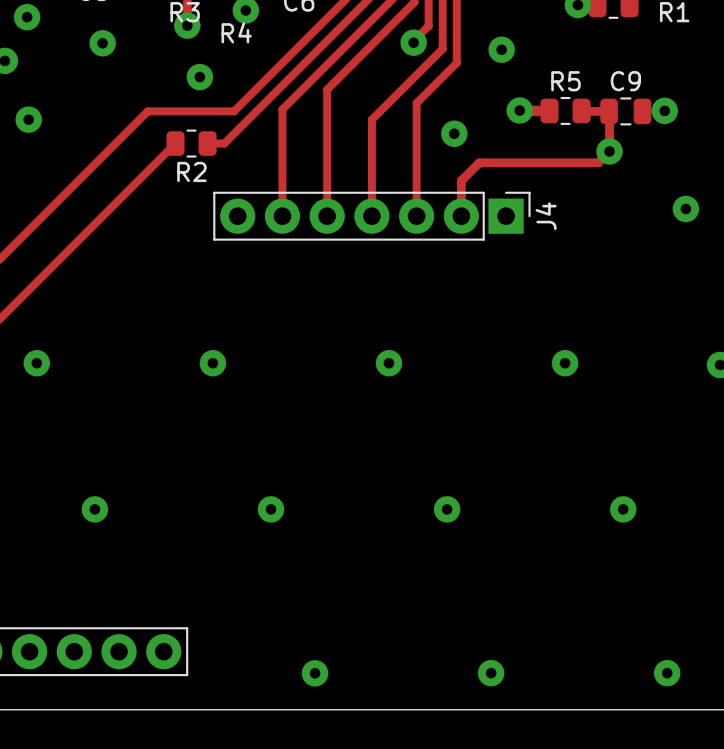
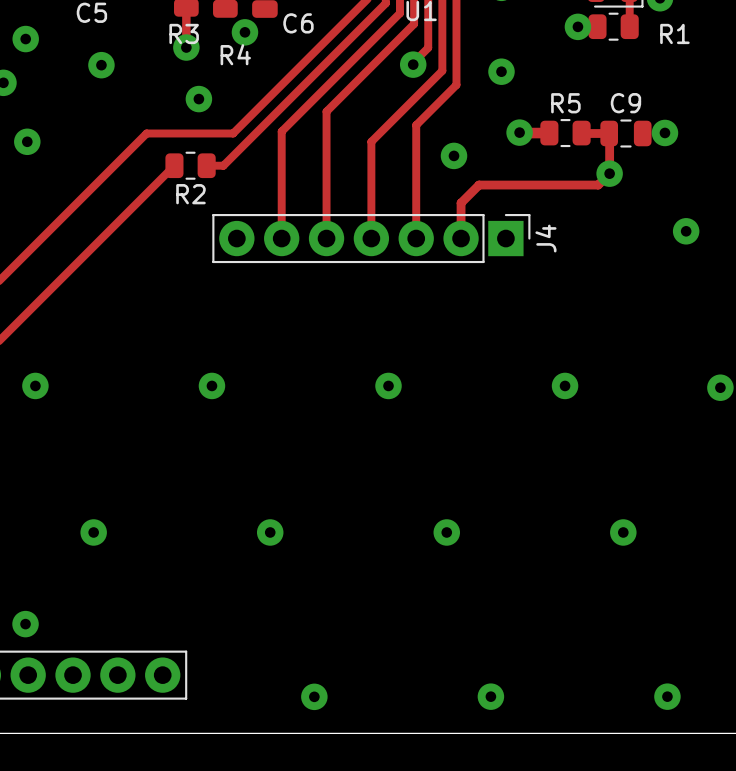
via: none -> (25, 624)

